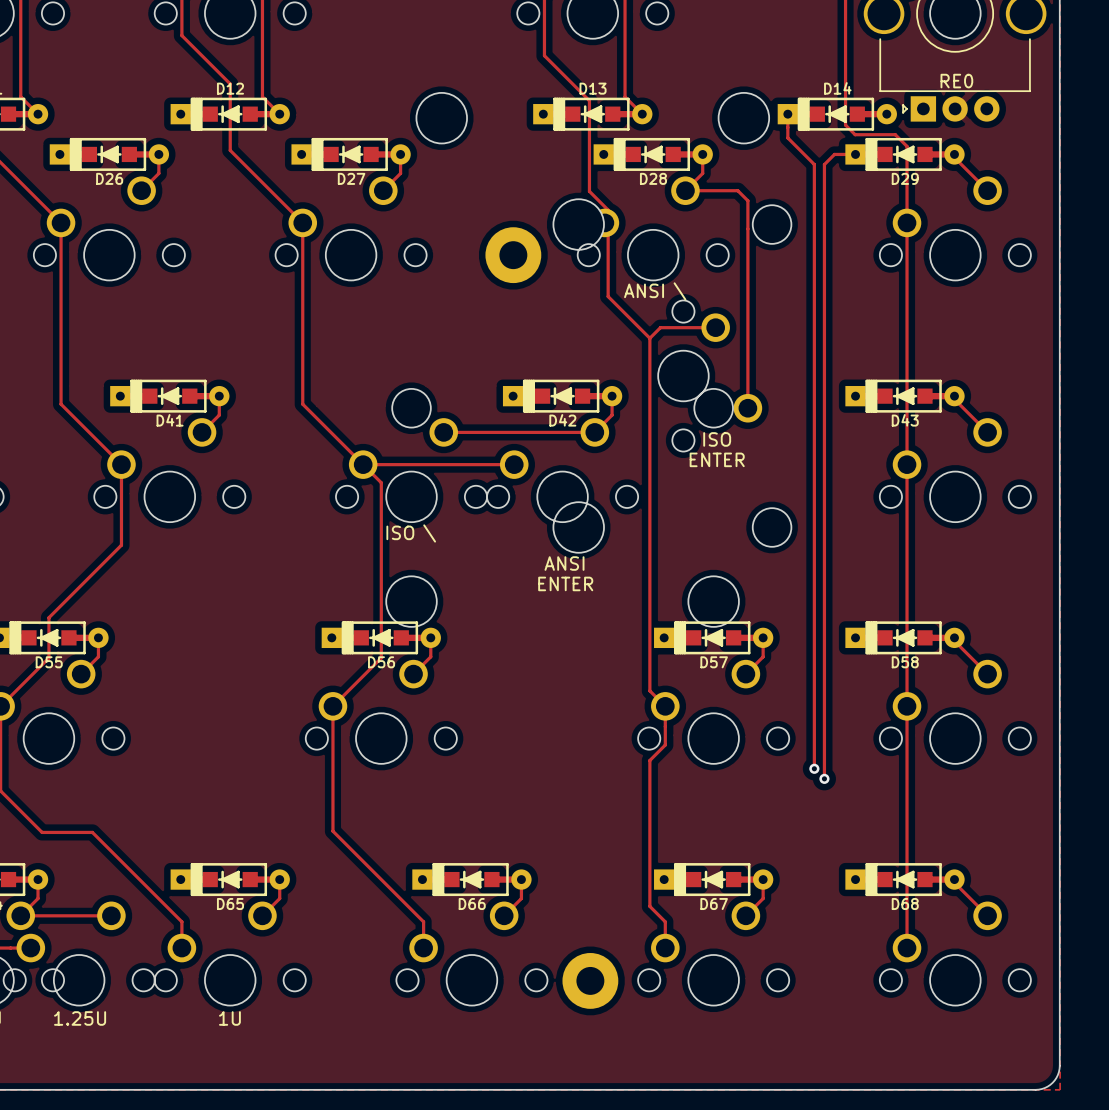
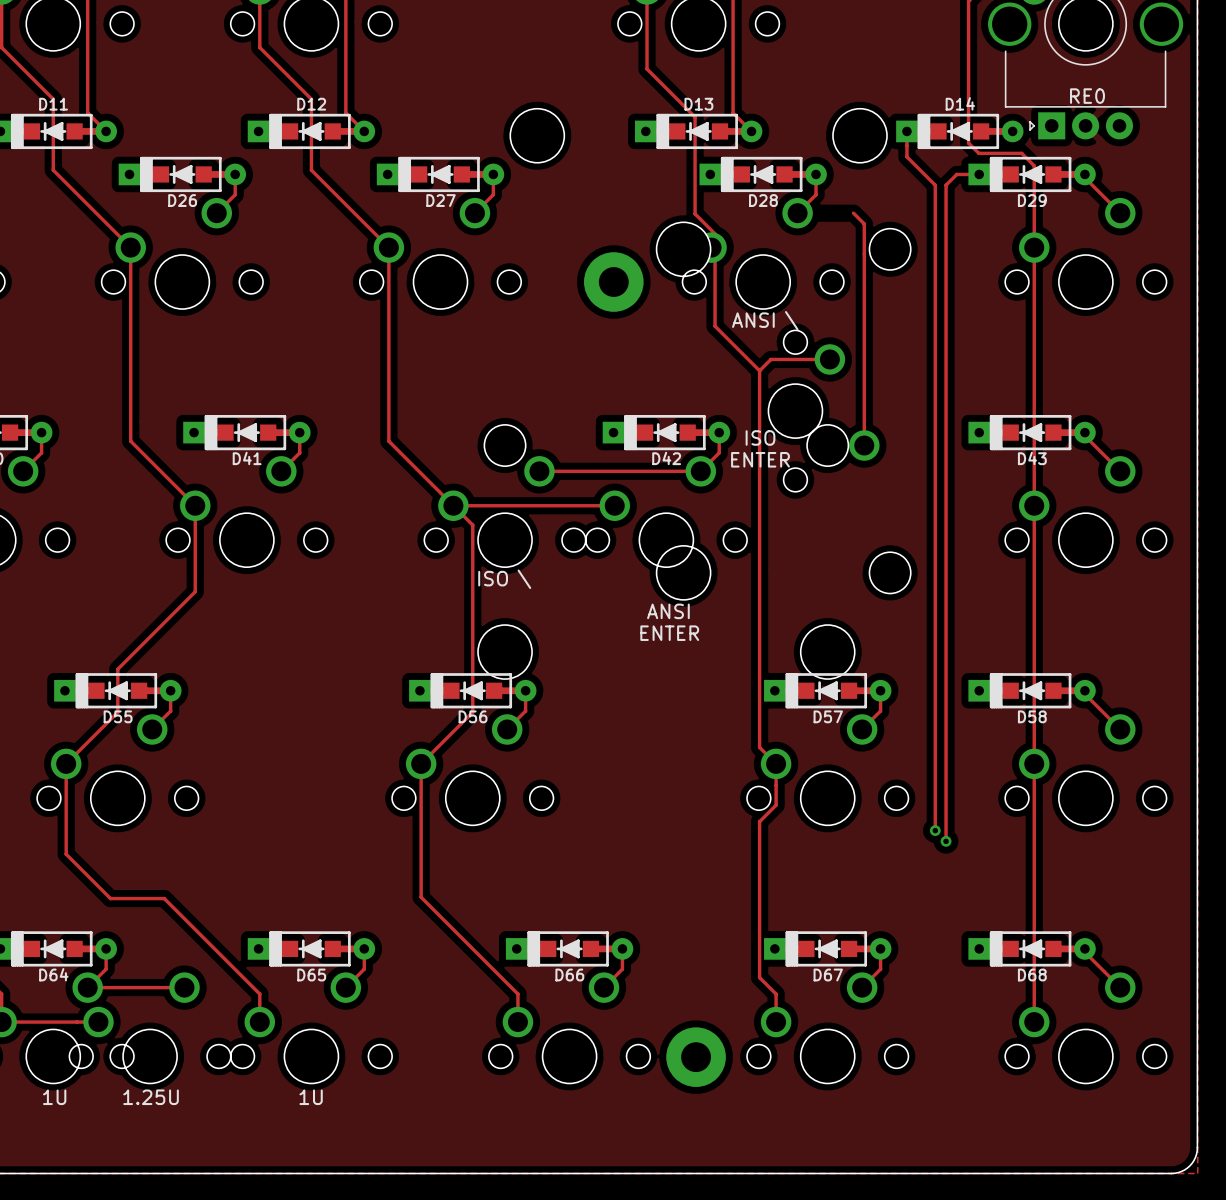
track: (685, 190) (737, 190) -> none
text position: ISO (717, 439) -> ISO (760, 437)
text position: ENTER (717, 459) -> ENTER (760, 459)

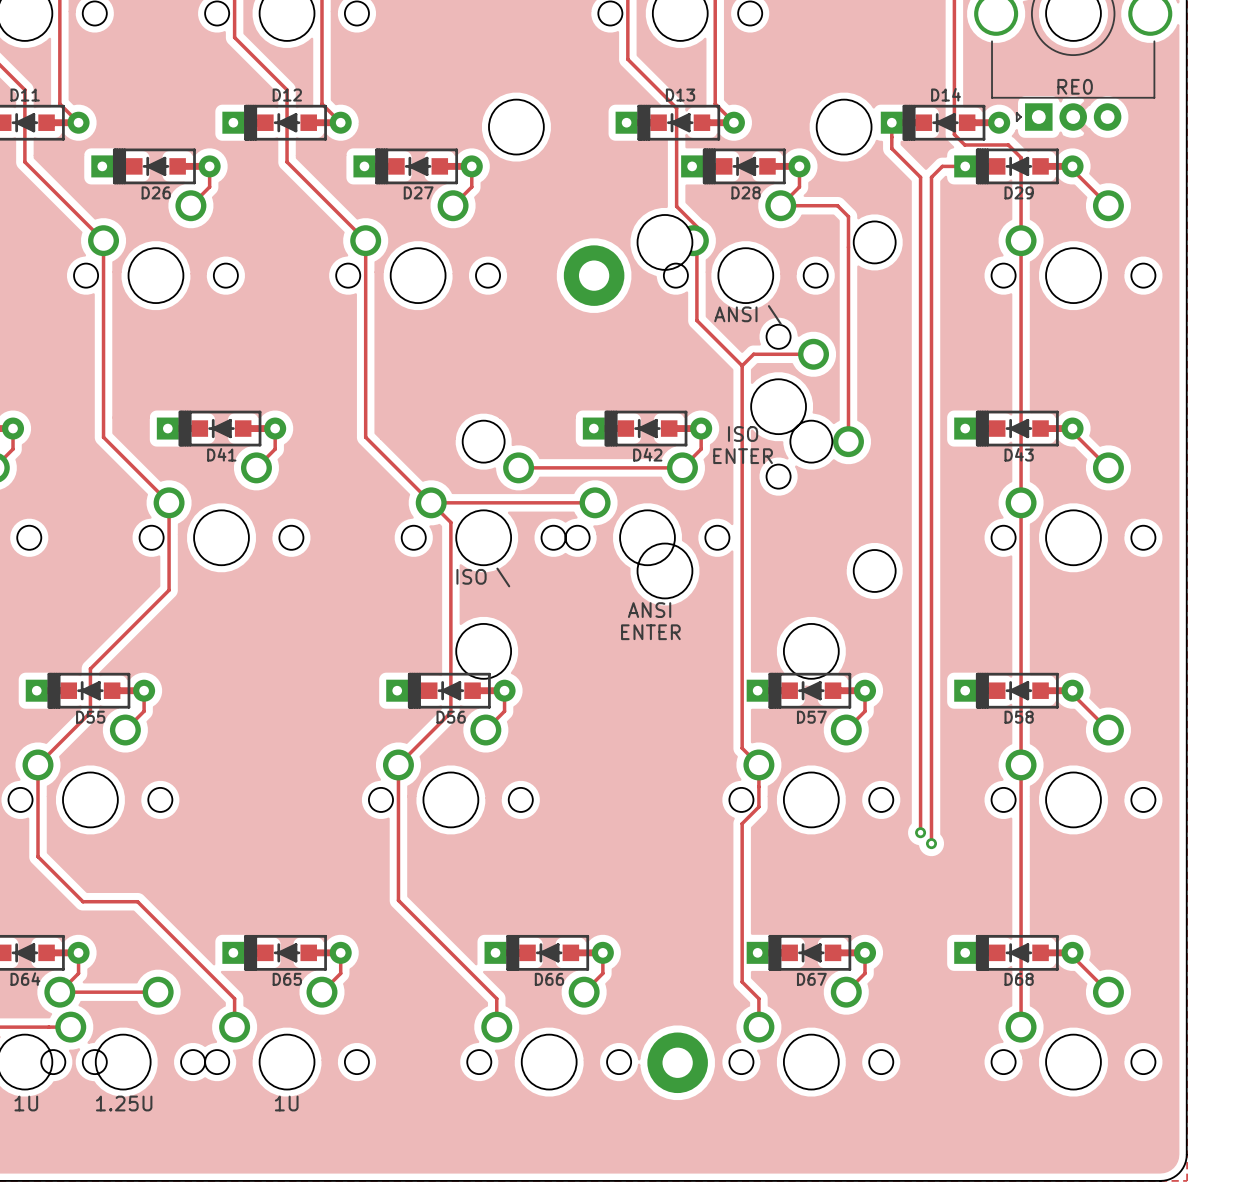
track: (853, 213) (864, 223) -> (780, 205) (837, 205) (848, 216)

